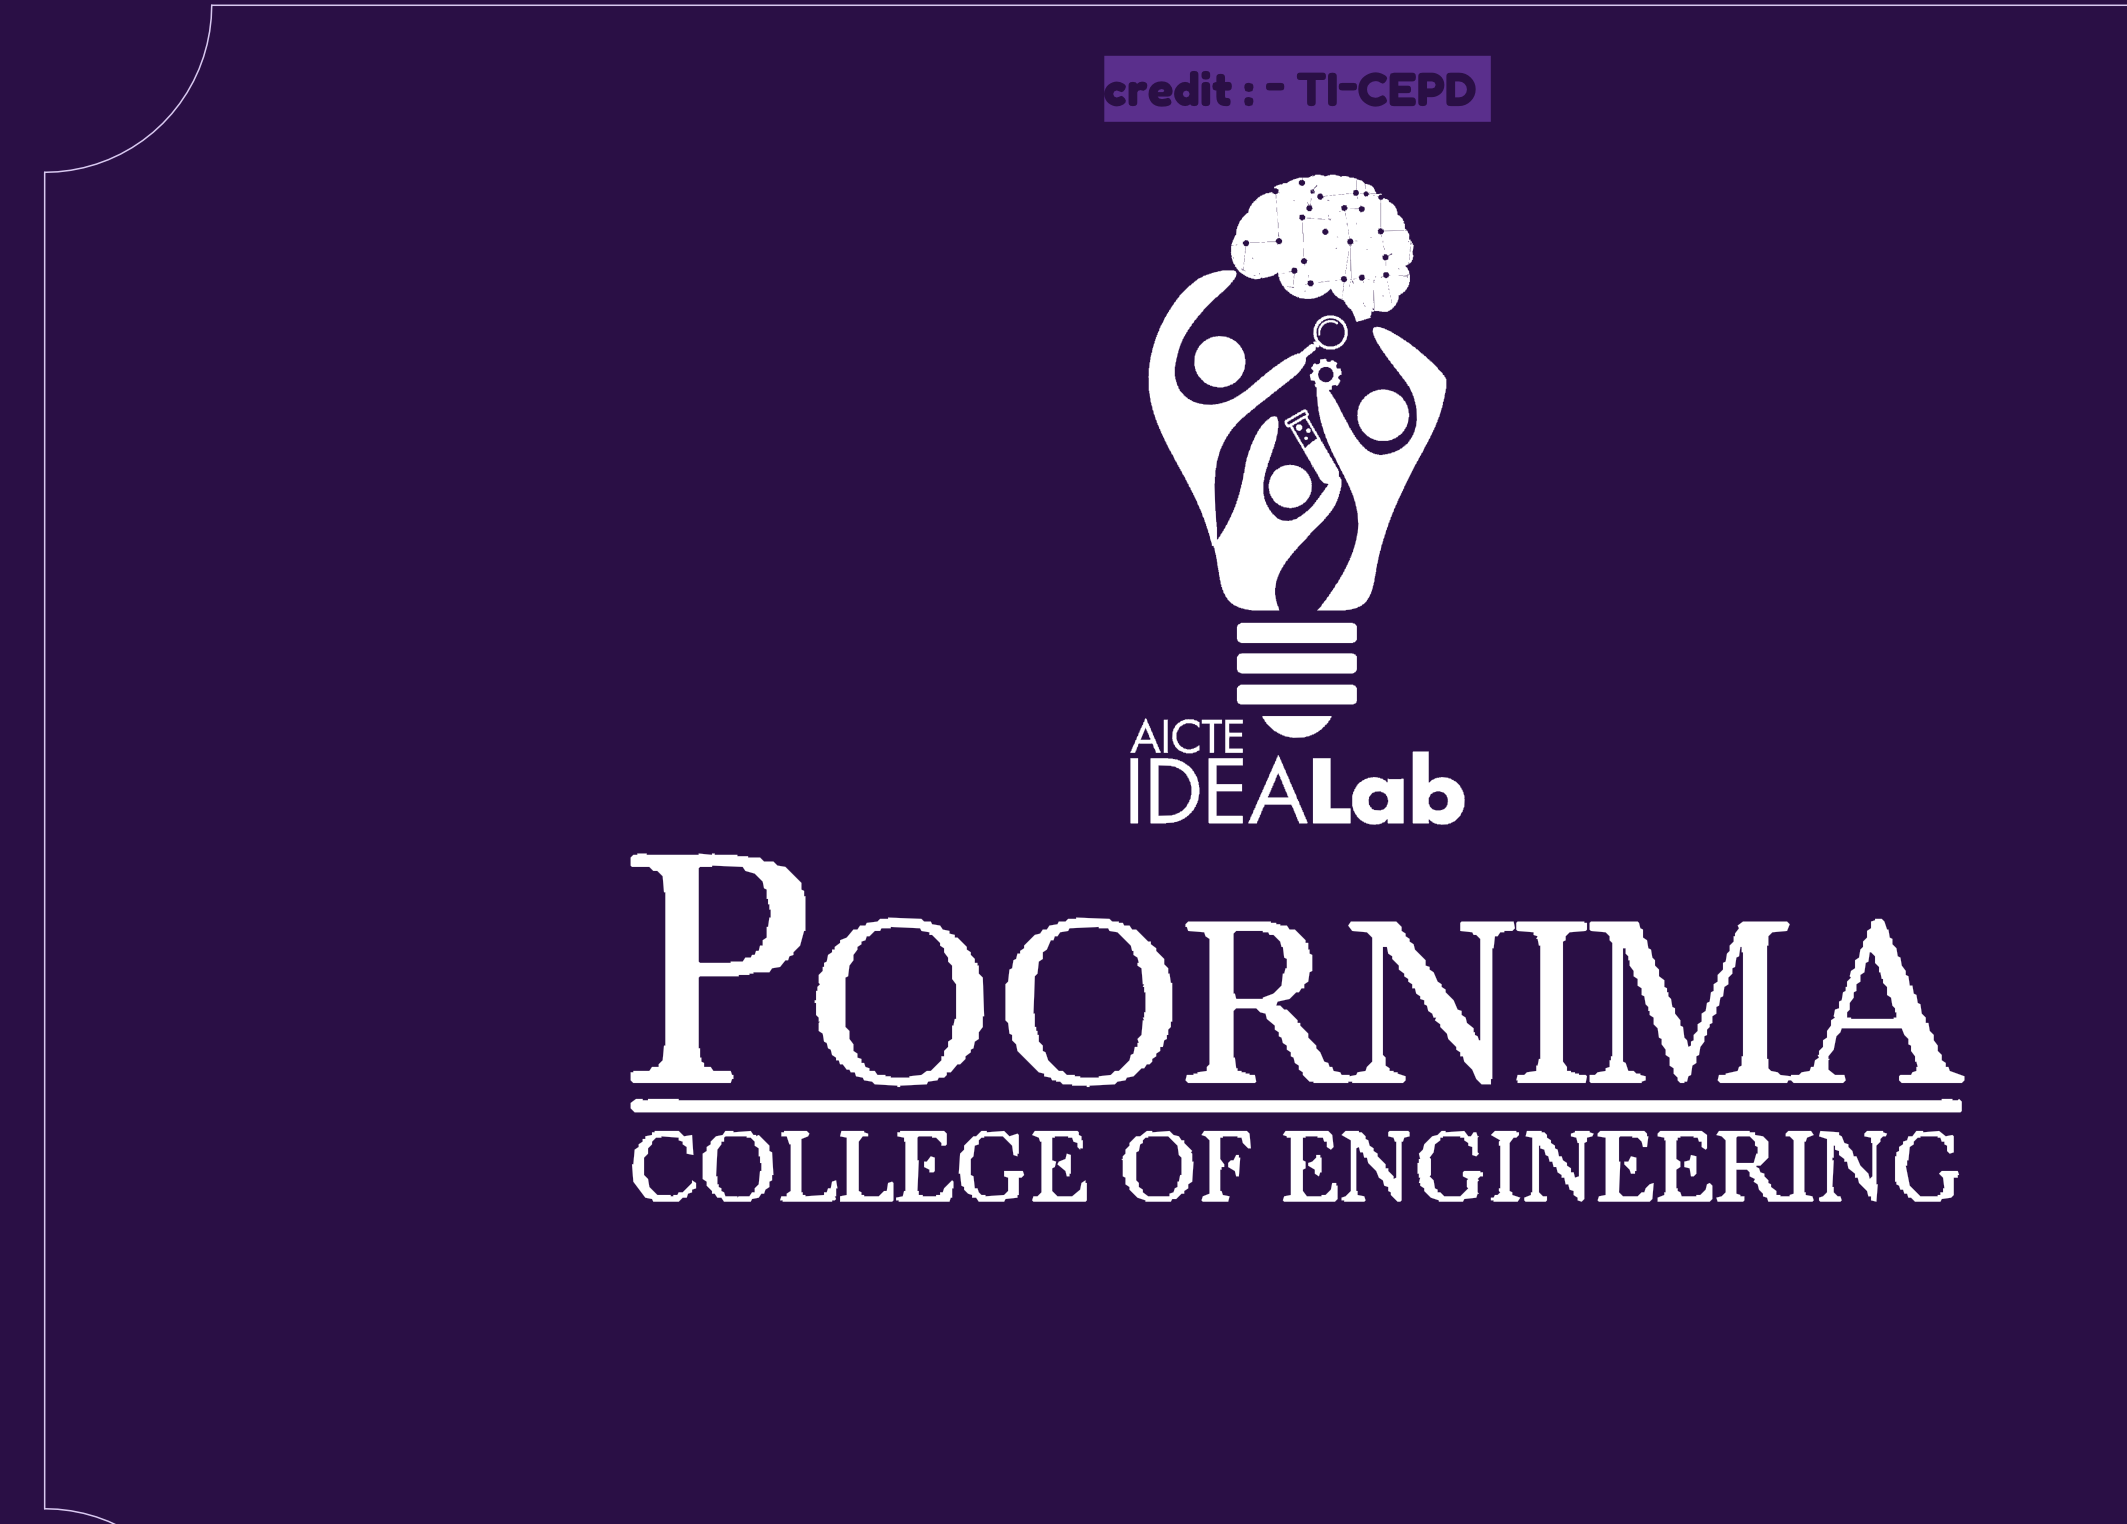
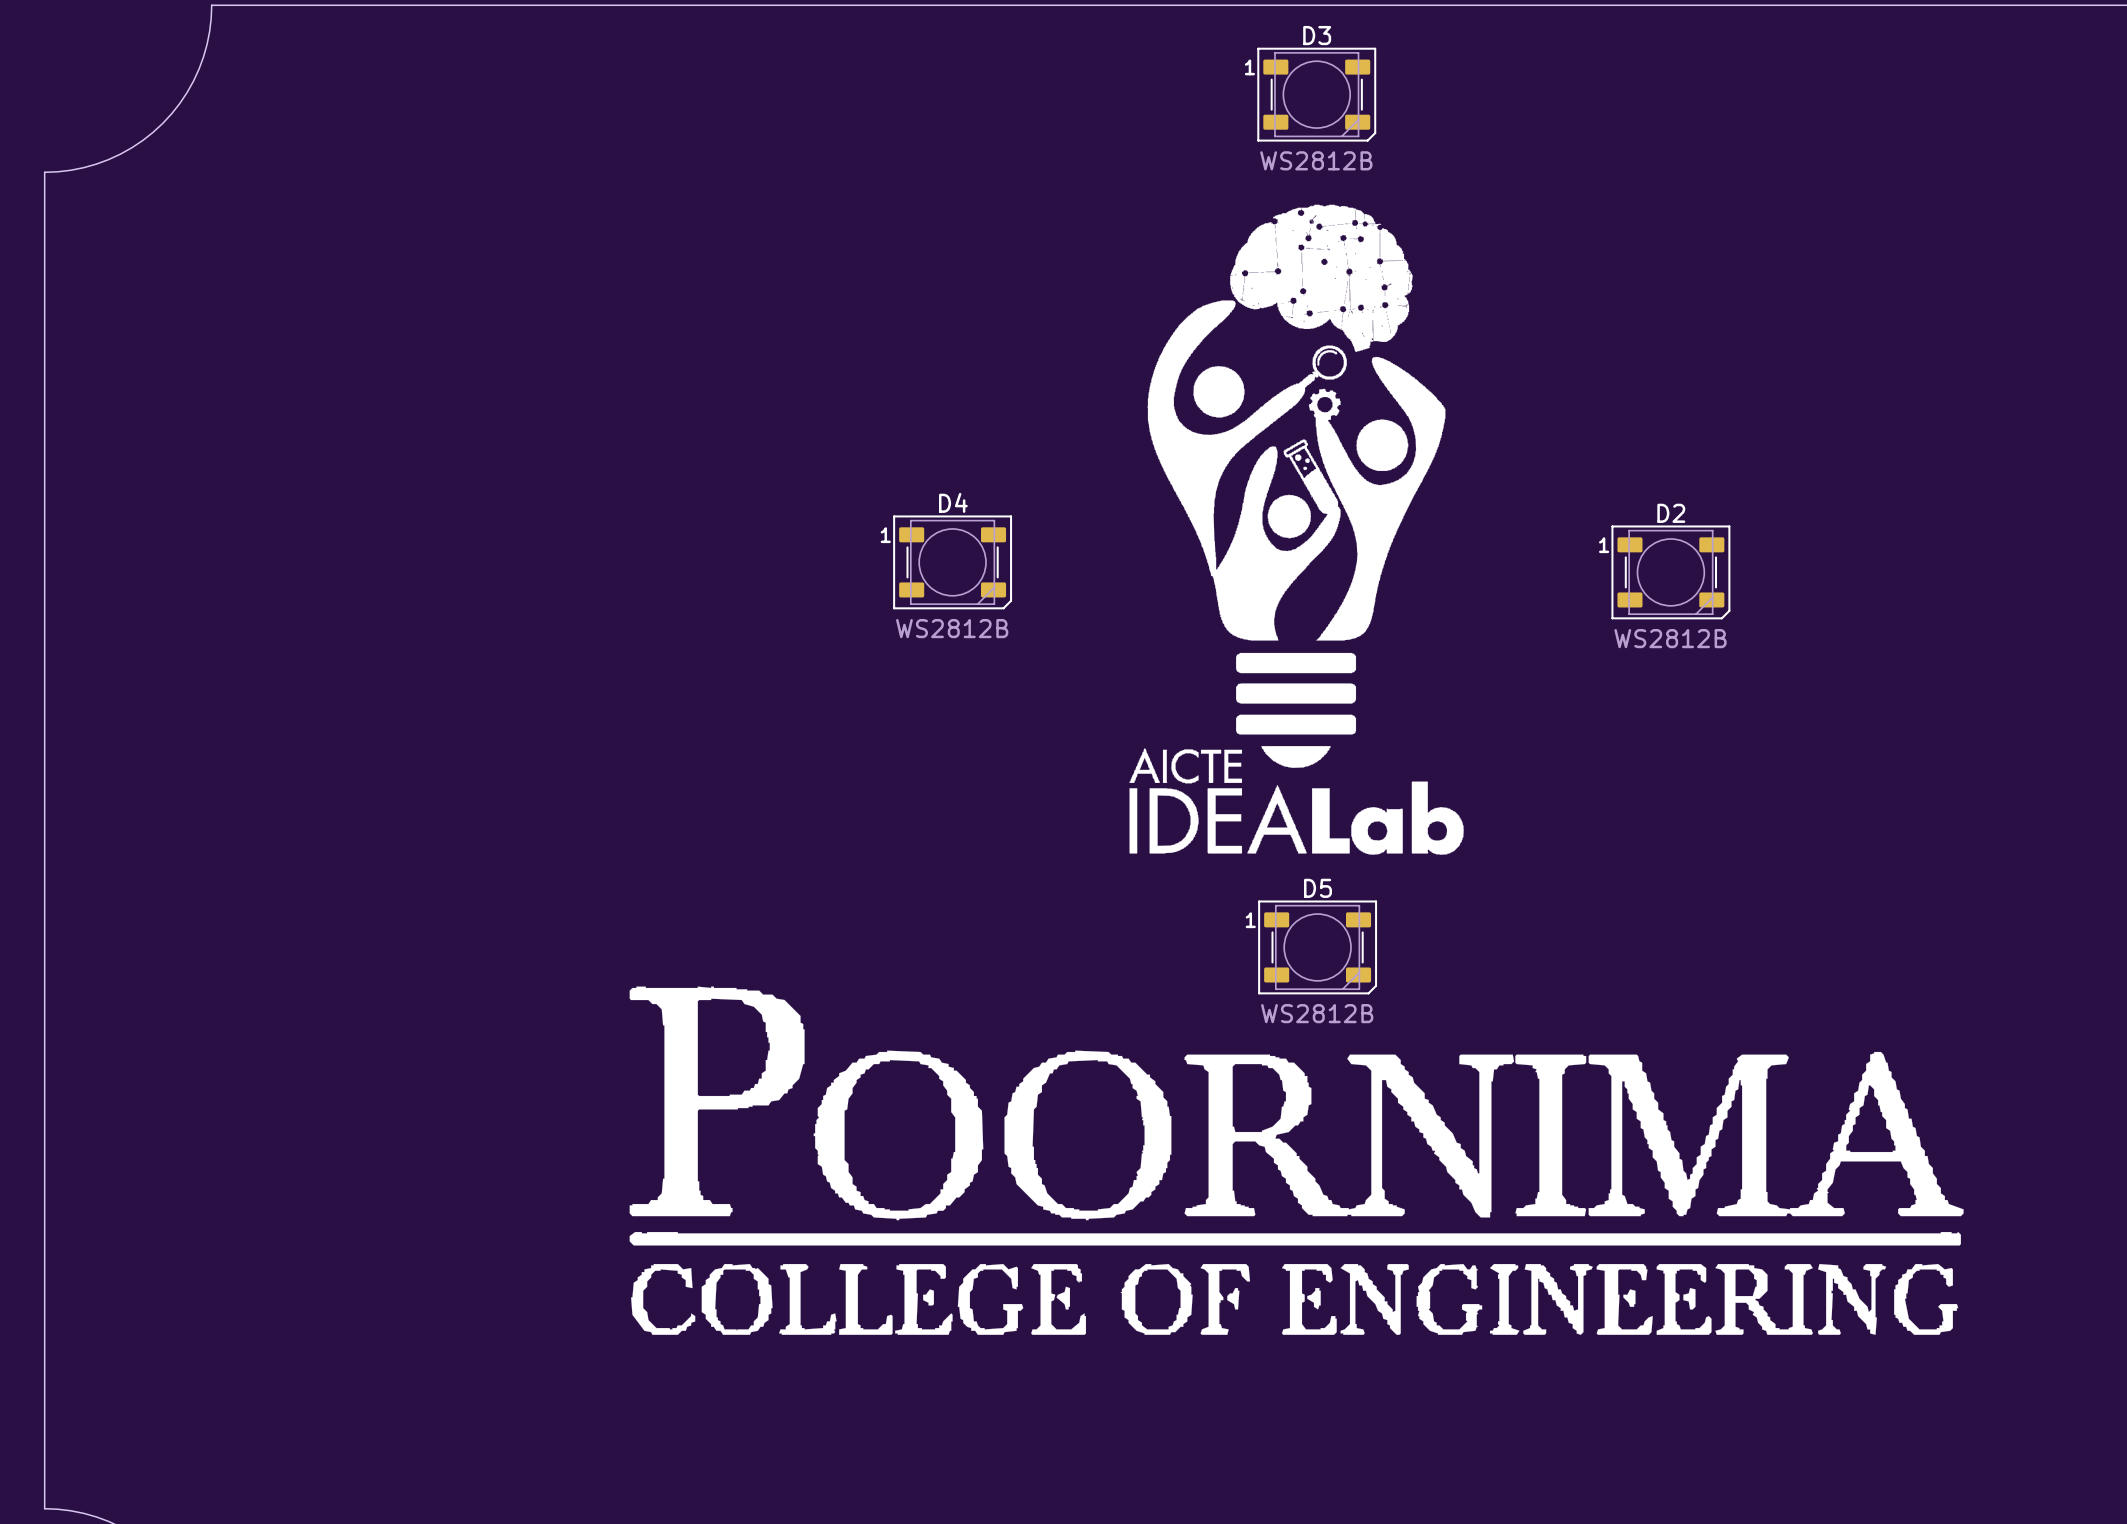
drawing: [1104, 55, 1491, 122] -> none
D3: none -> WS2812B (1316, 94)
drawing position: (1297, 499) -> (1296, 529)
D4: none -> WS2812B (952, 562)
D2: none -> WS2812B (1670, 572)
D5: none -> WS2812B (1317, 947)
drawing position: (1297, 1027) -> (1296, 1160)

